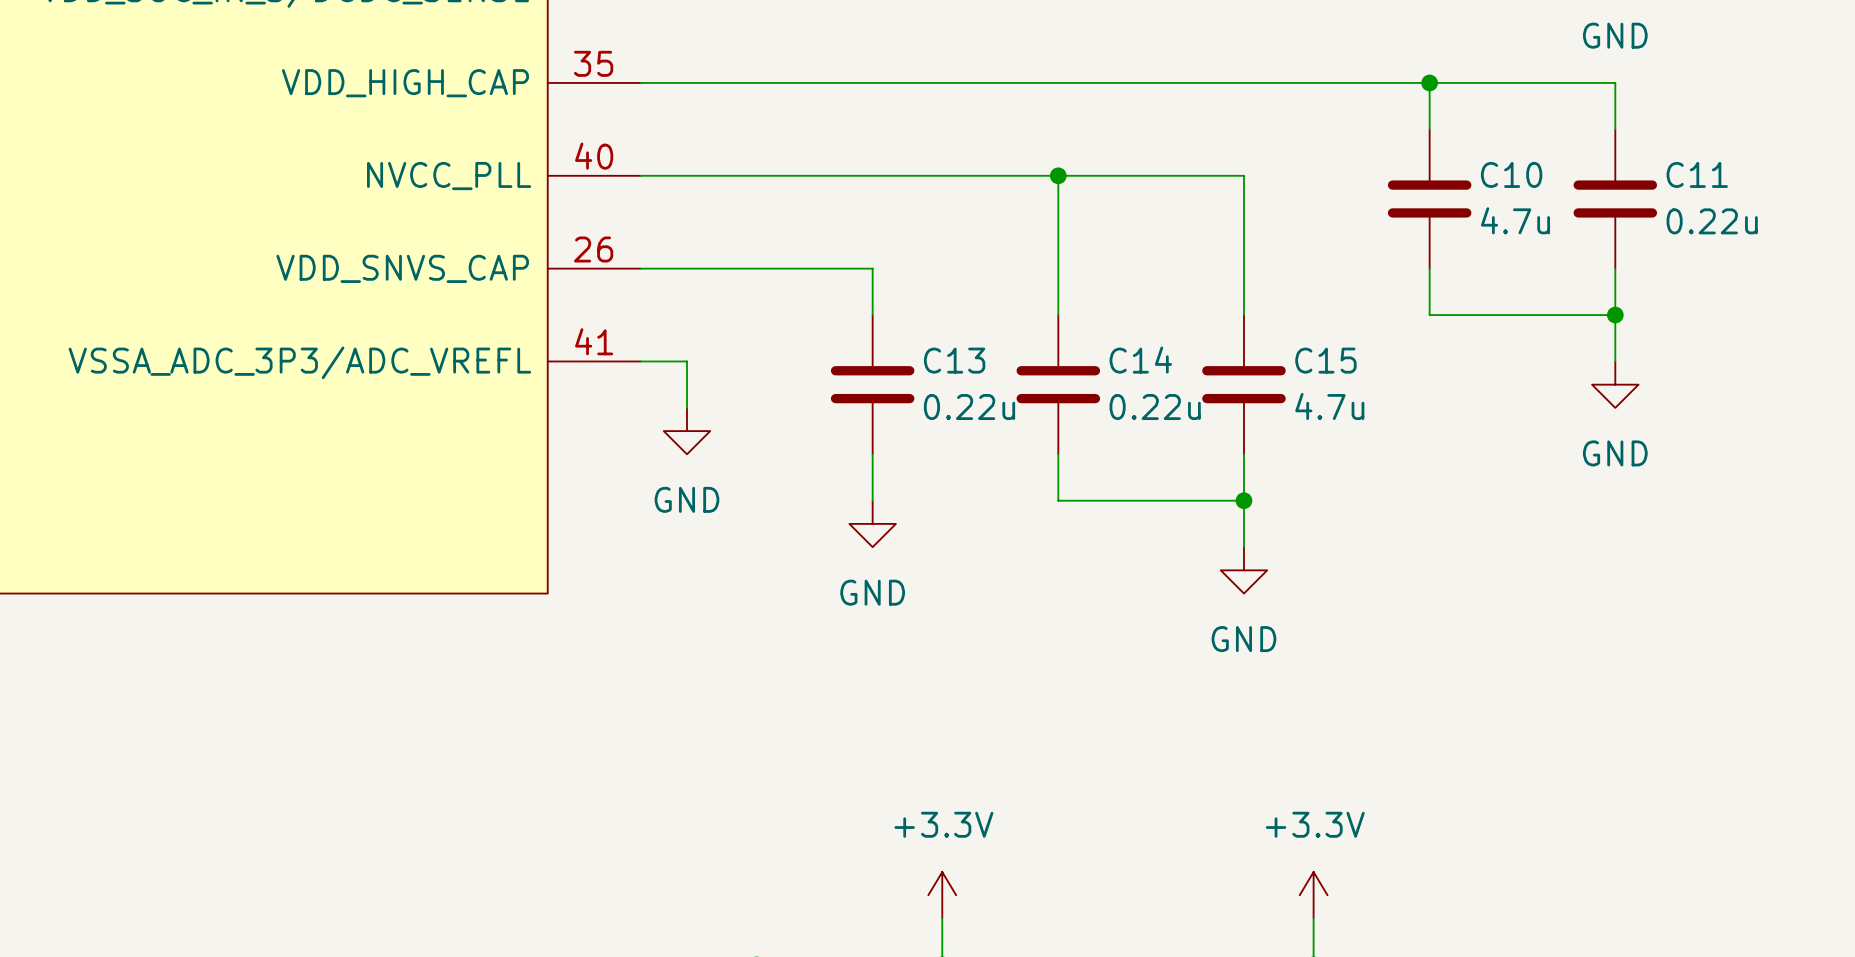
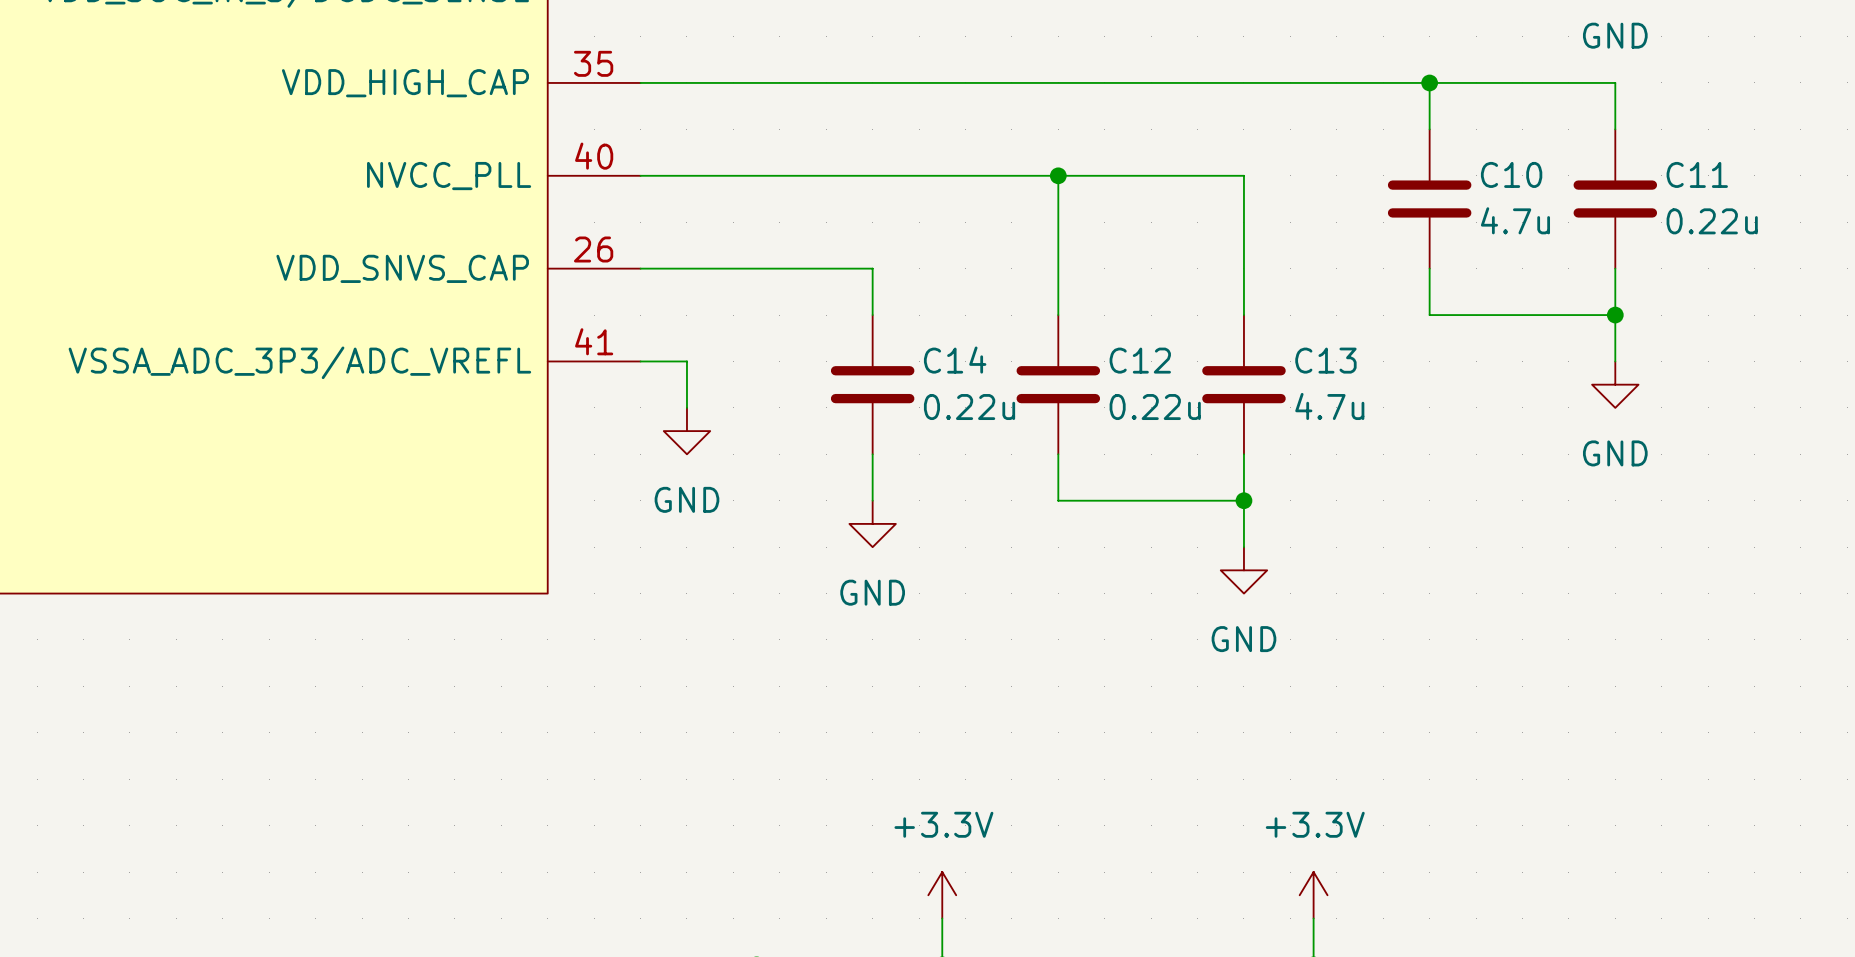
C13 name: C13 (954, 360) -> C14 (955, 360)
C14 name: C14 (1140, 360) -> C12 (1140, 360)
C15 name: C15 (1325, 360) -> C13 (1325, 360)

